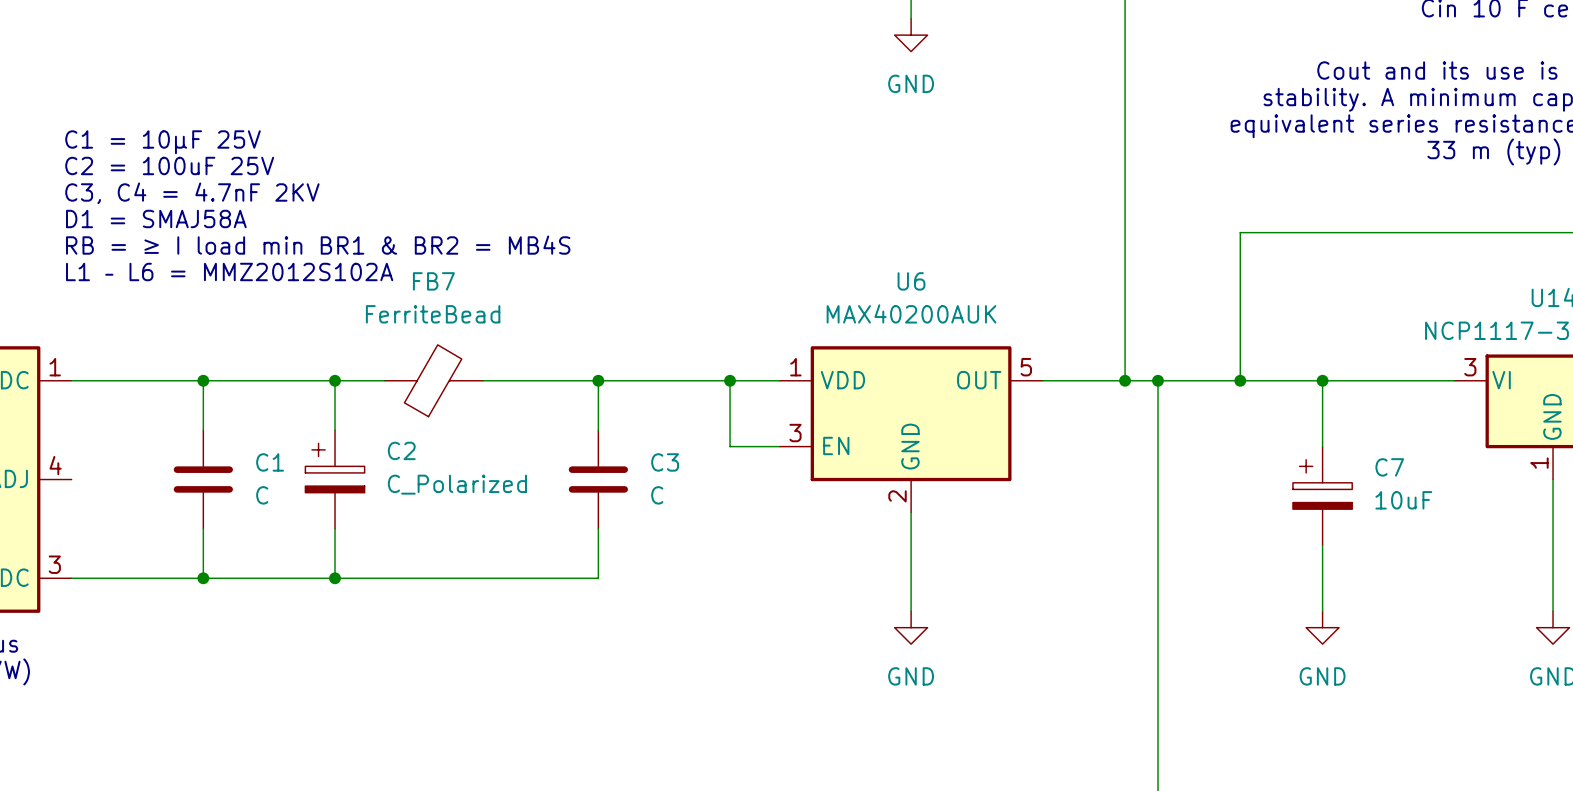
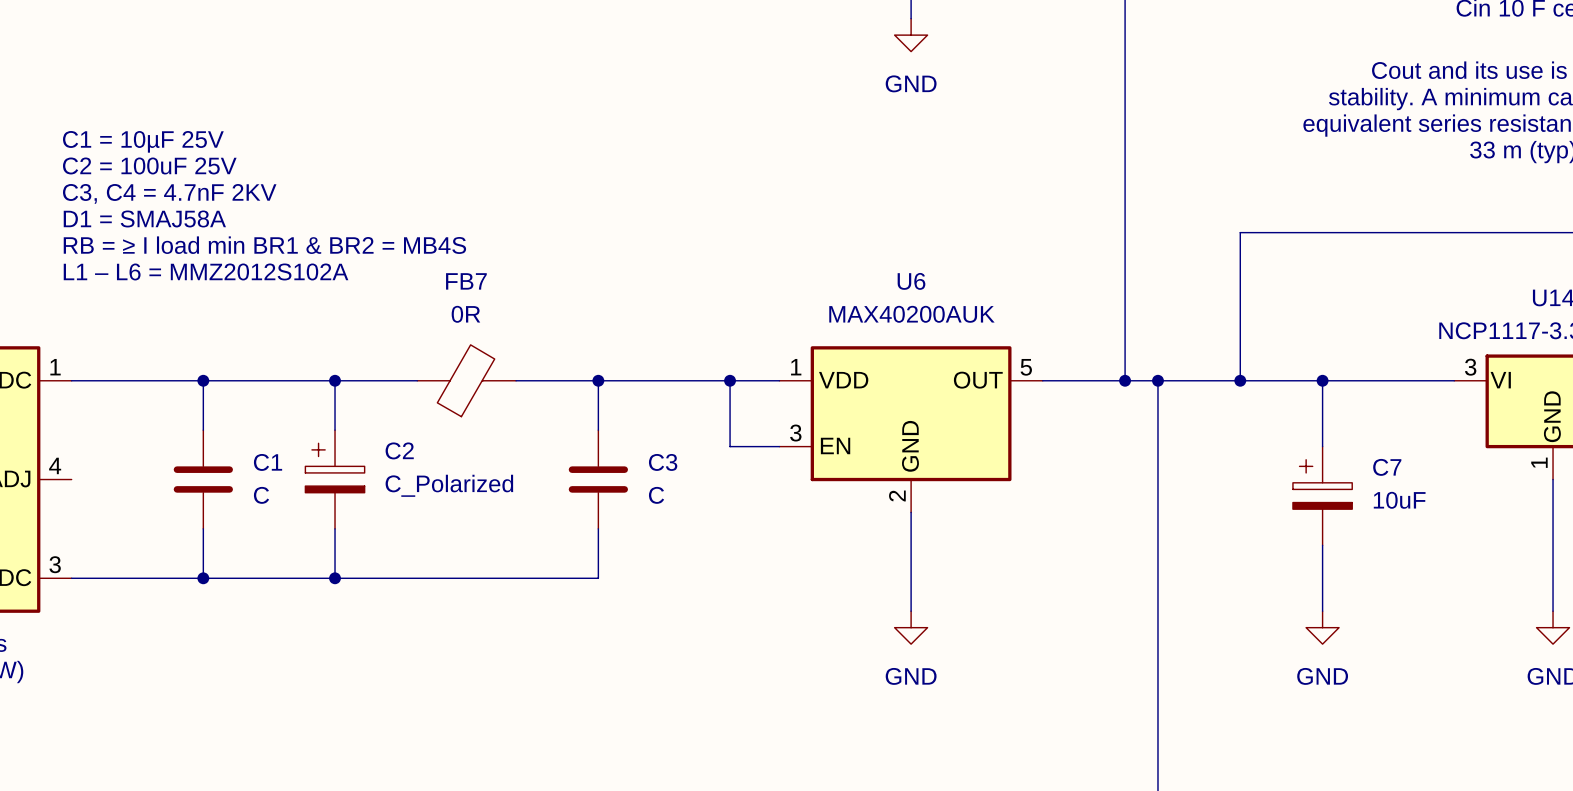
FB7 value: FerriteBead (433, 314) -> 0R (465, 314)
FB7 position: (433, 380) -> (466, 380)

